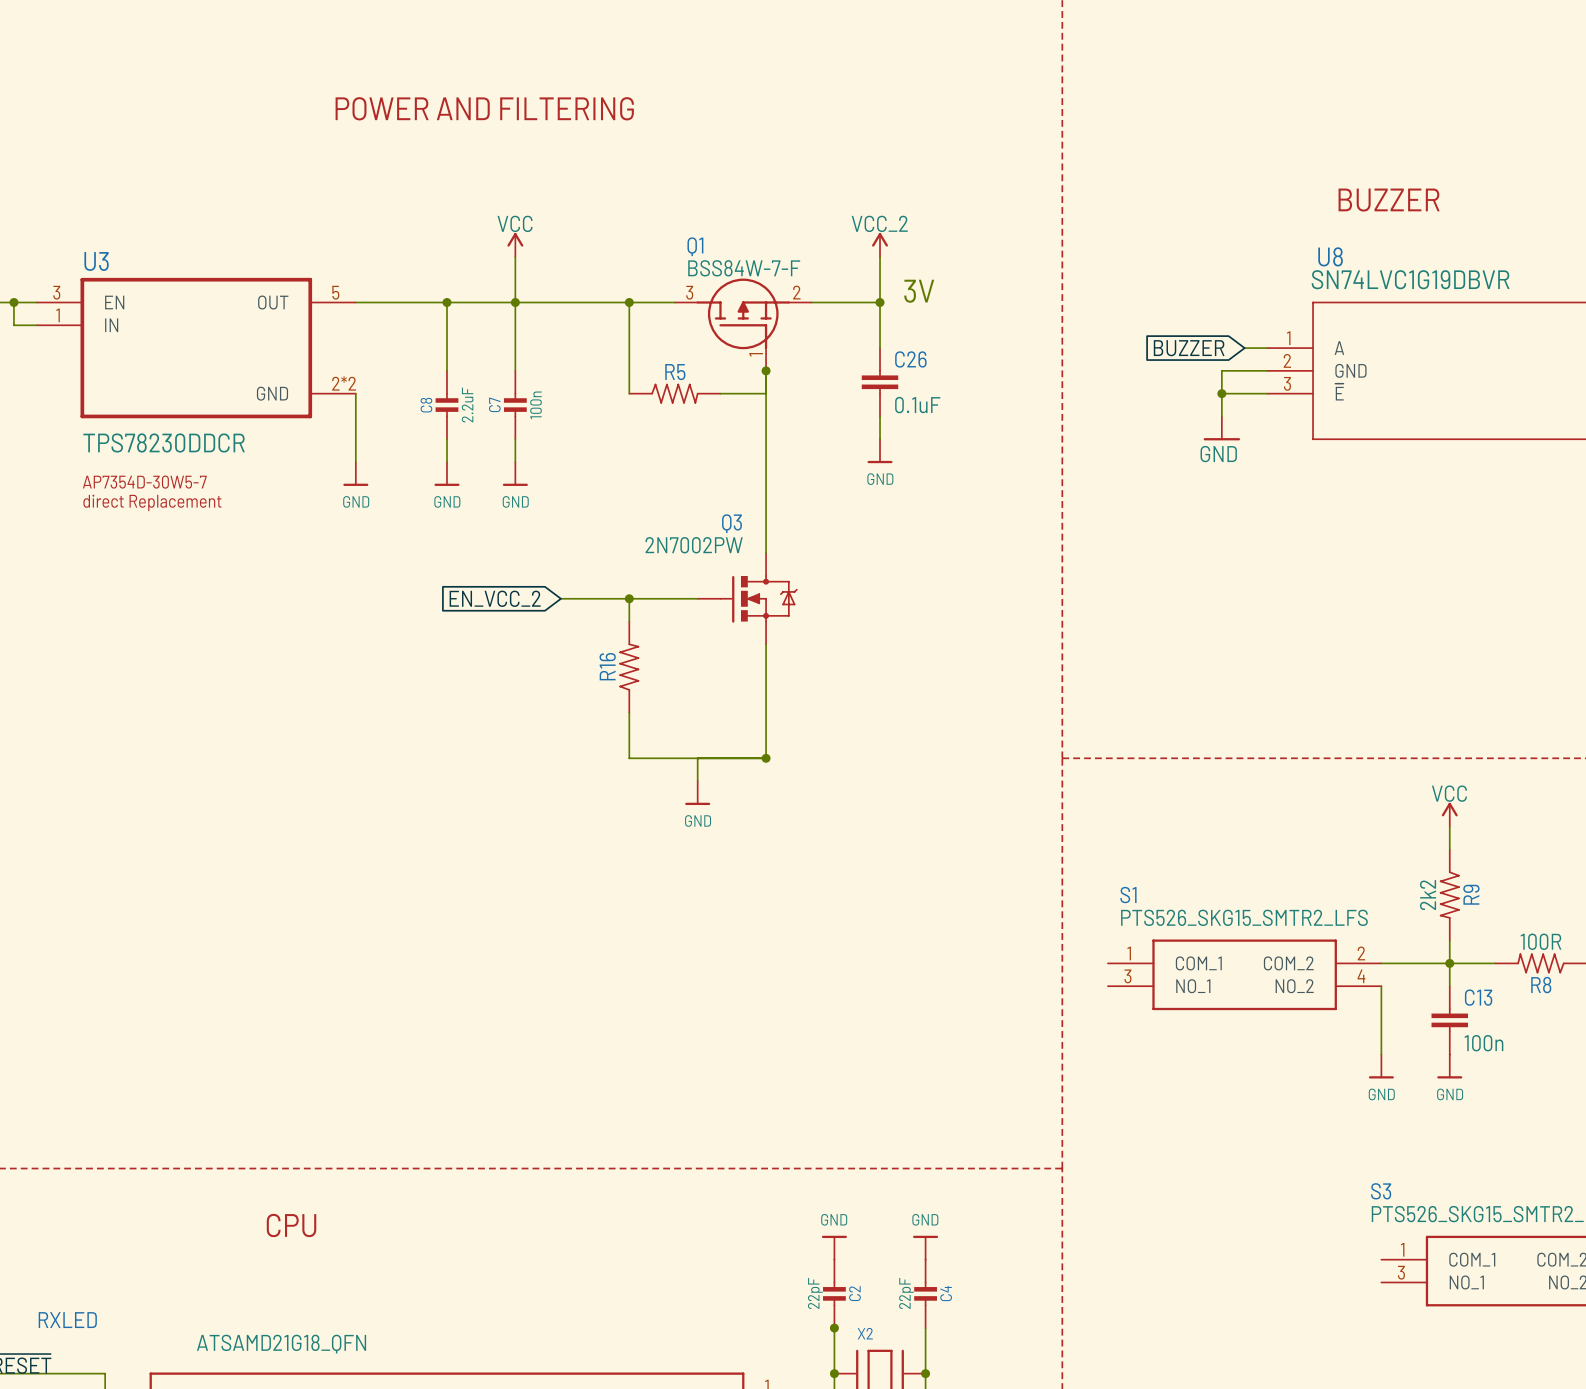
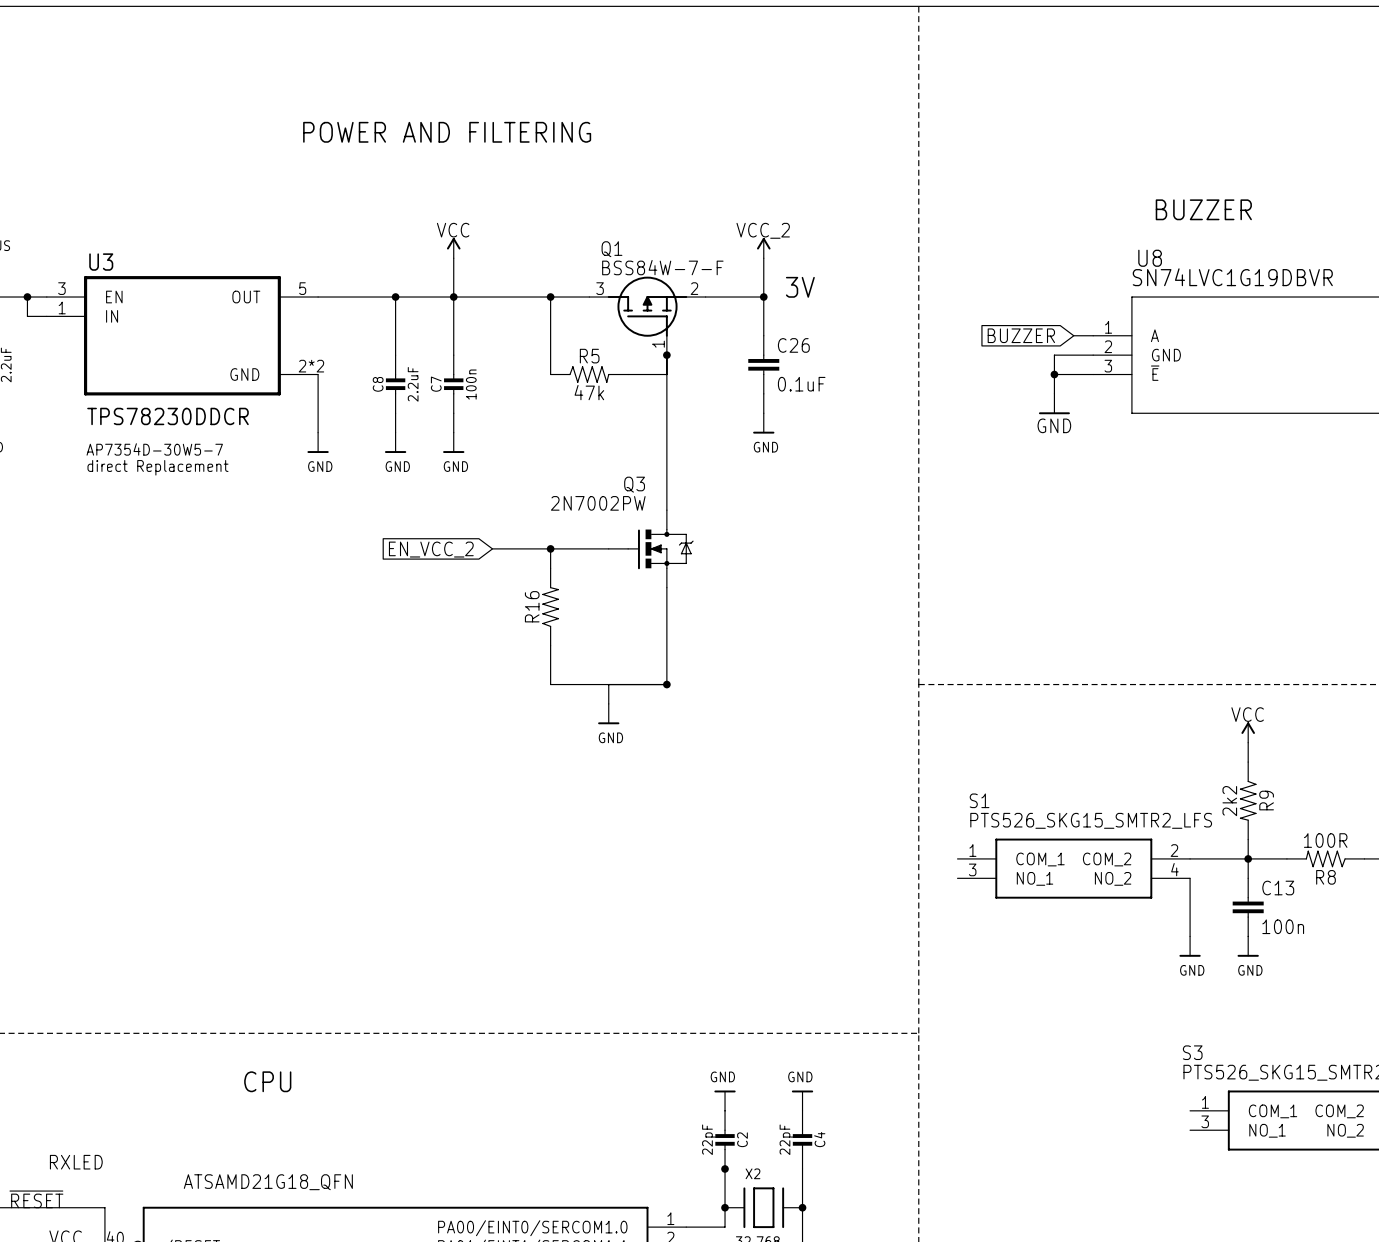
R5 value: none -> 47k (589, 392)

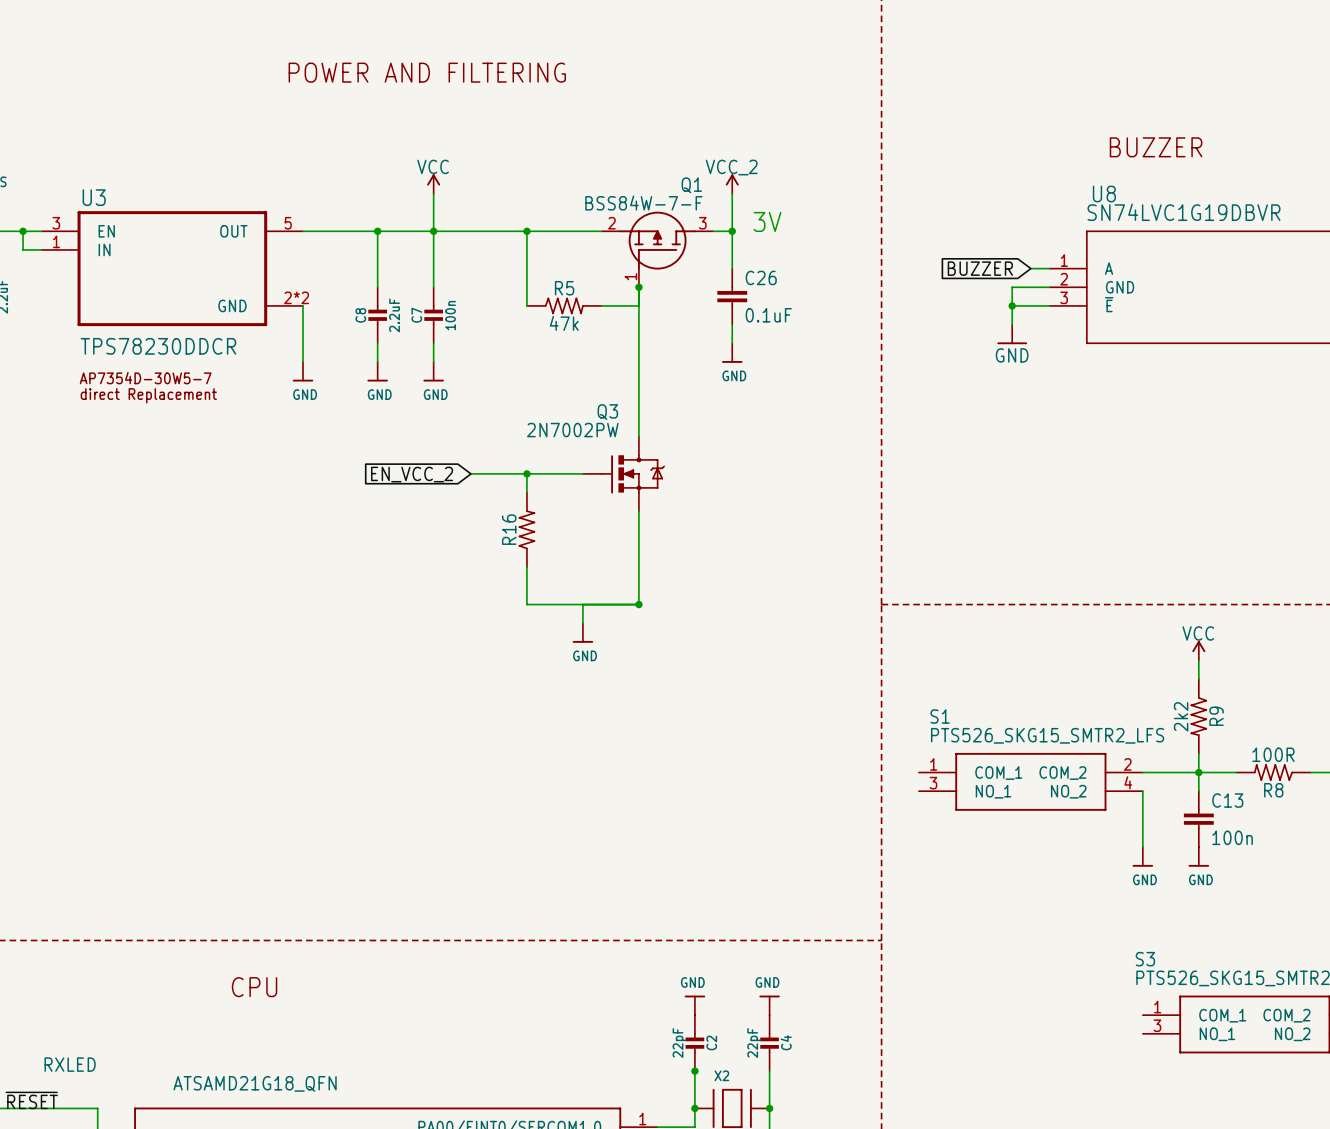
Q1 flip: as is (647, 306) -> left-right (657, 240)

